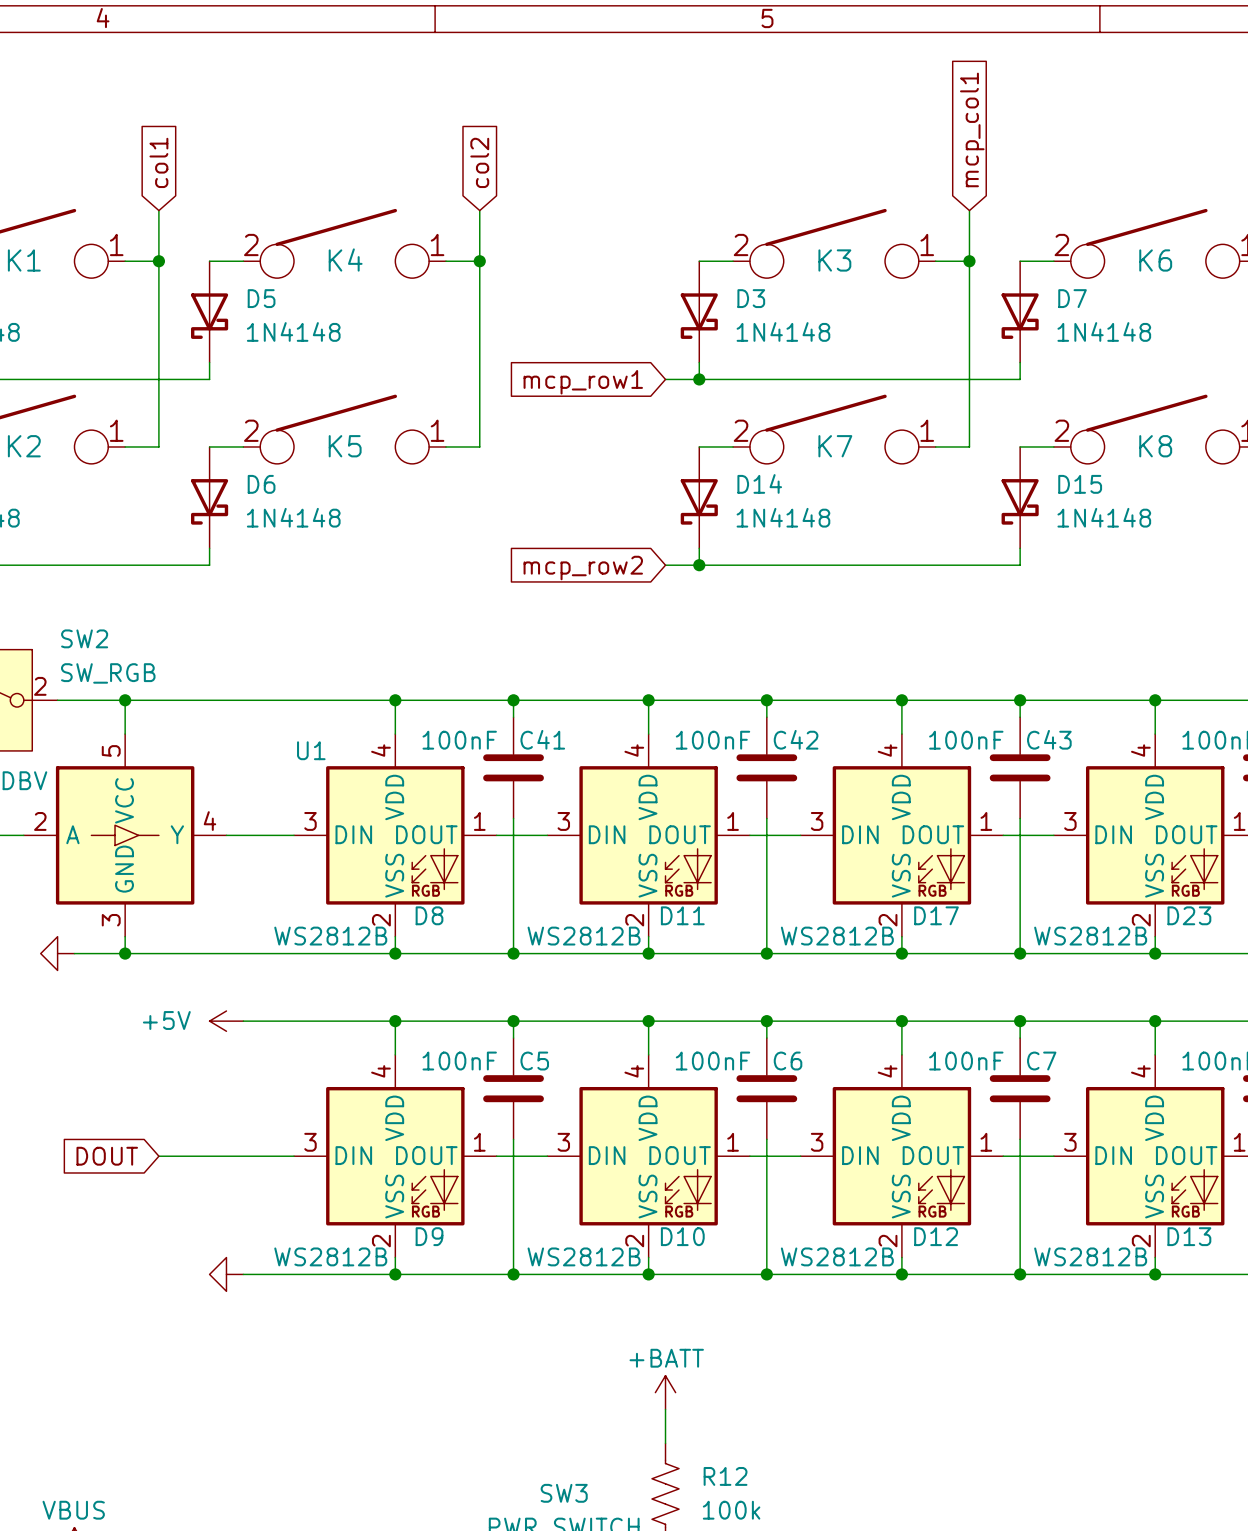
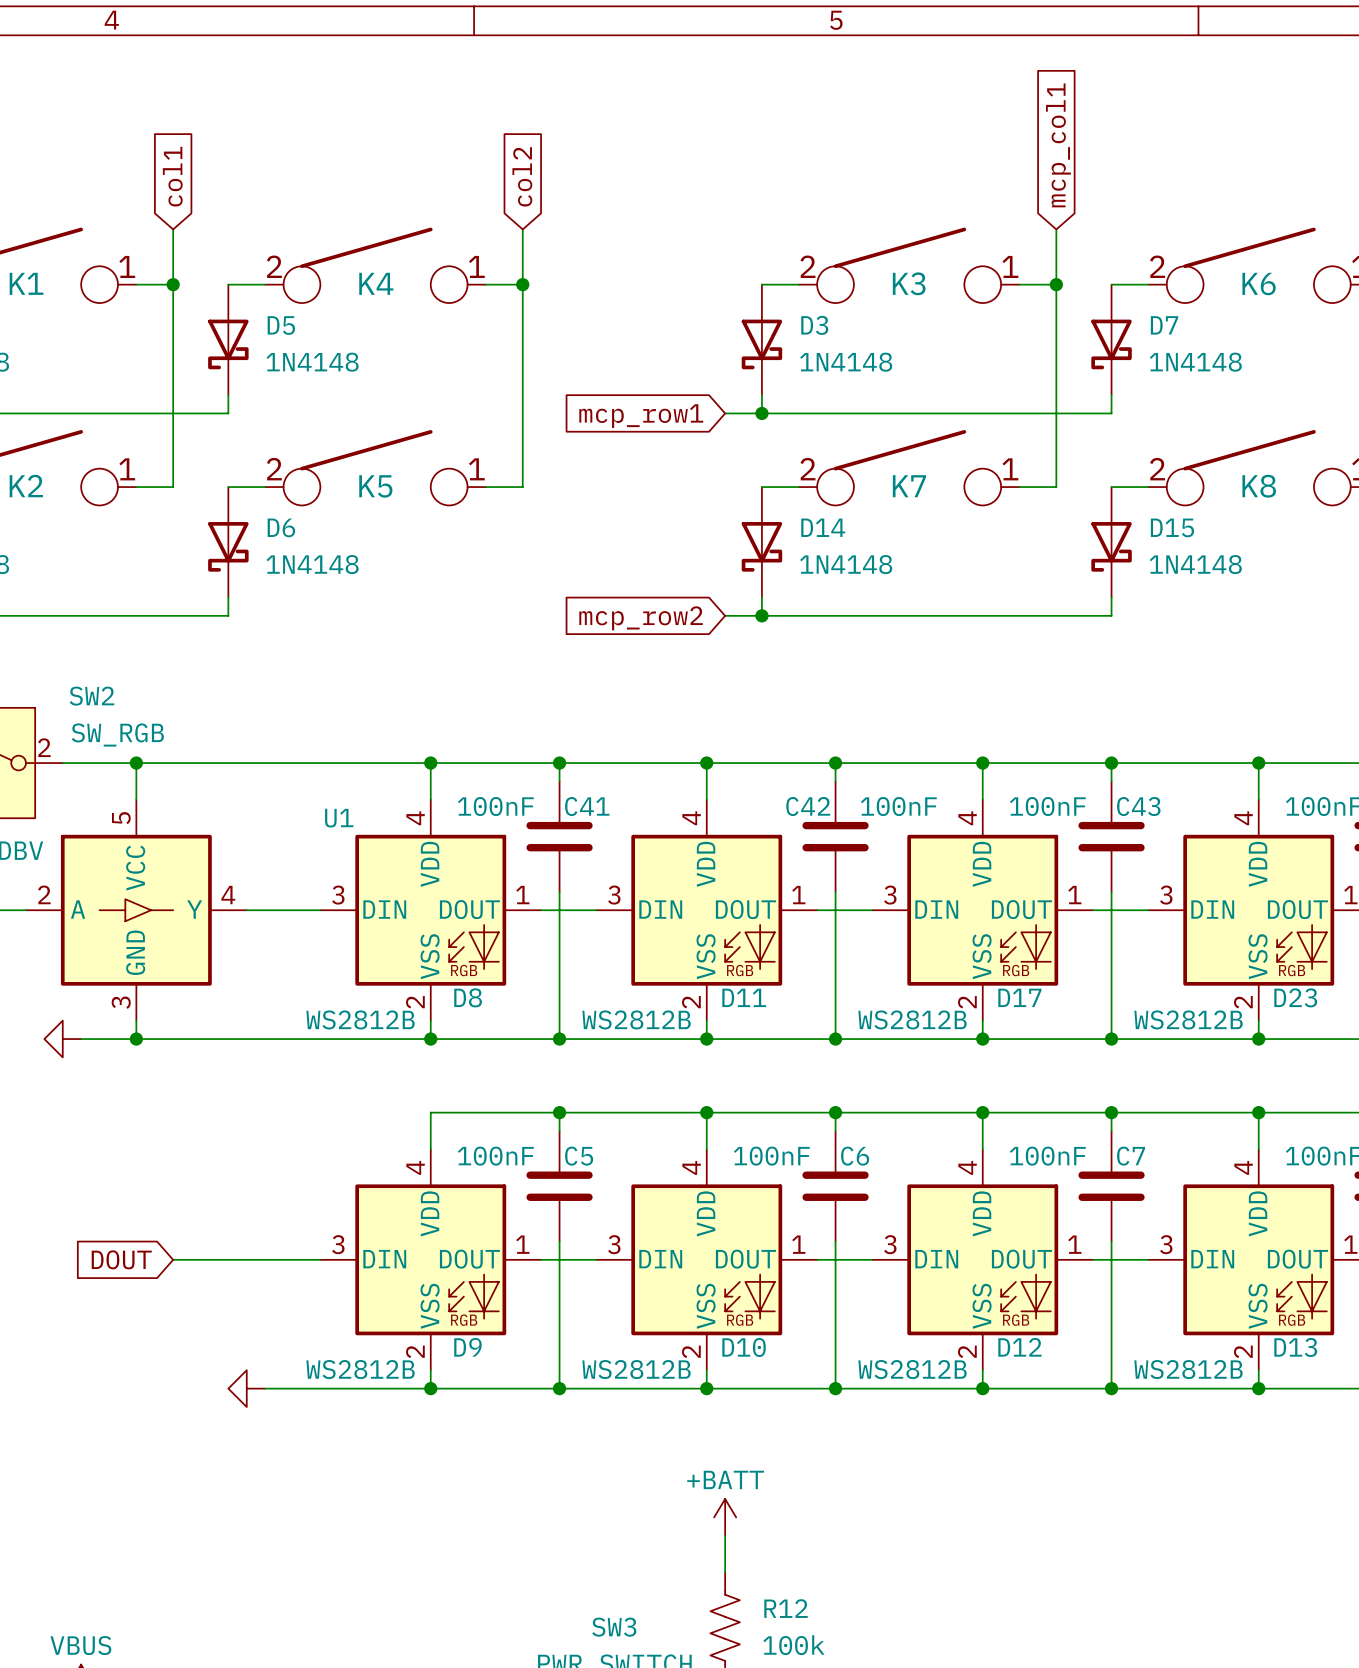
C42 name position: C42 (796, 739) -> C42 (808, 806)
C42 value position: 100nF (713, 740) -> 100nF (898, 806)
power symbol: +5V (226, 1021) -> none
wire: (243, 1021) (395, 1021) -> none
junction: (395, 1021) -> none

